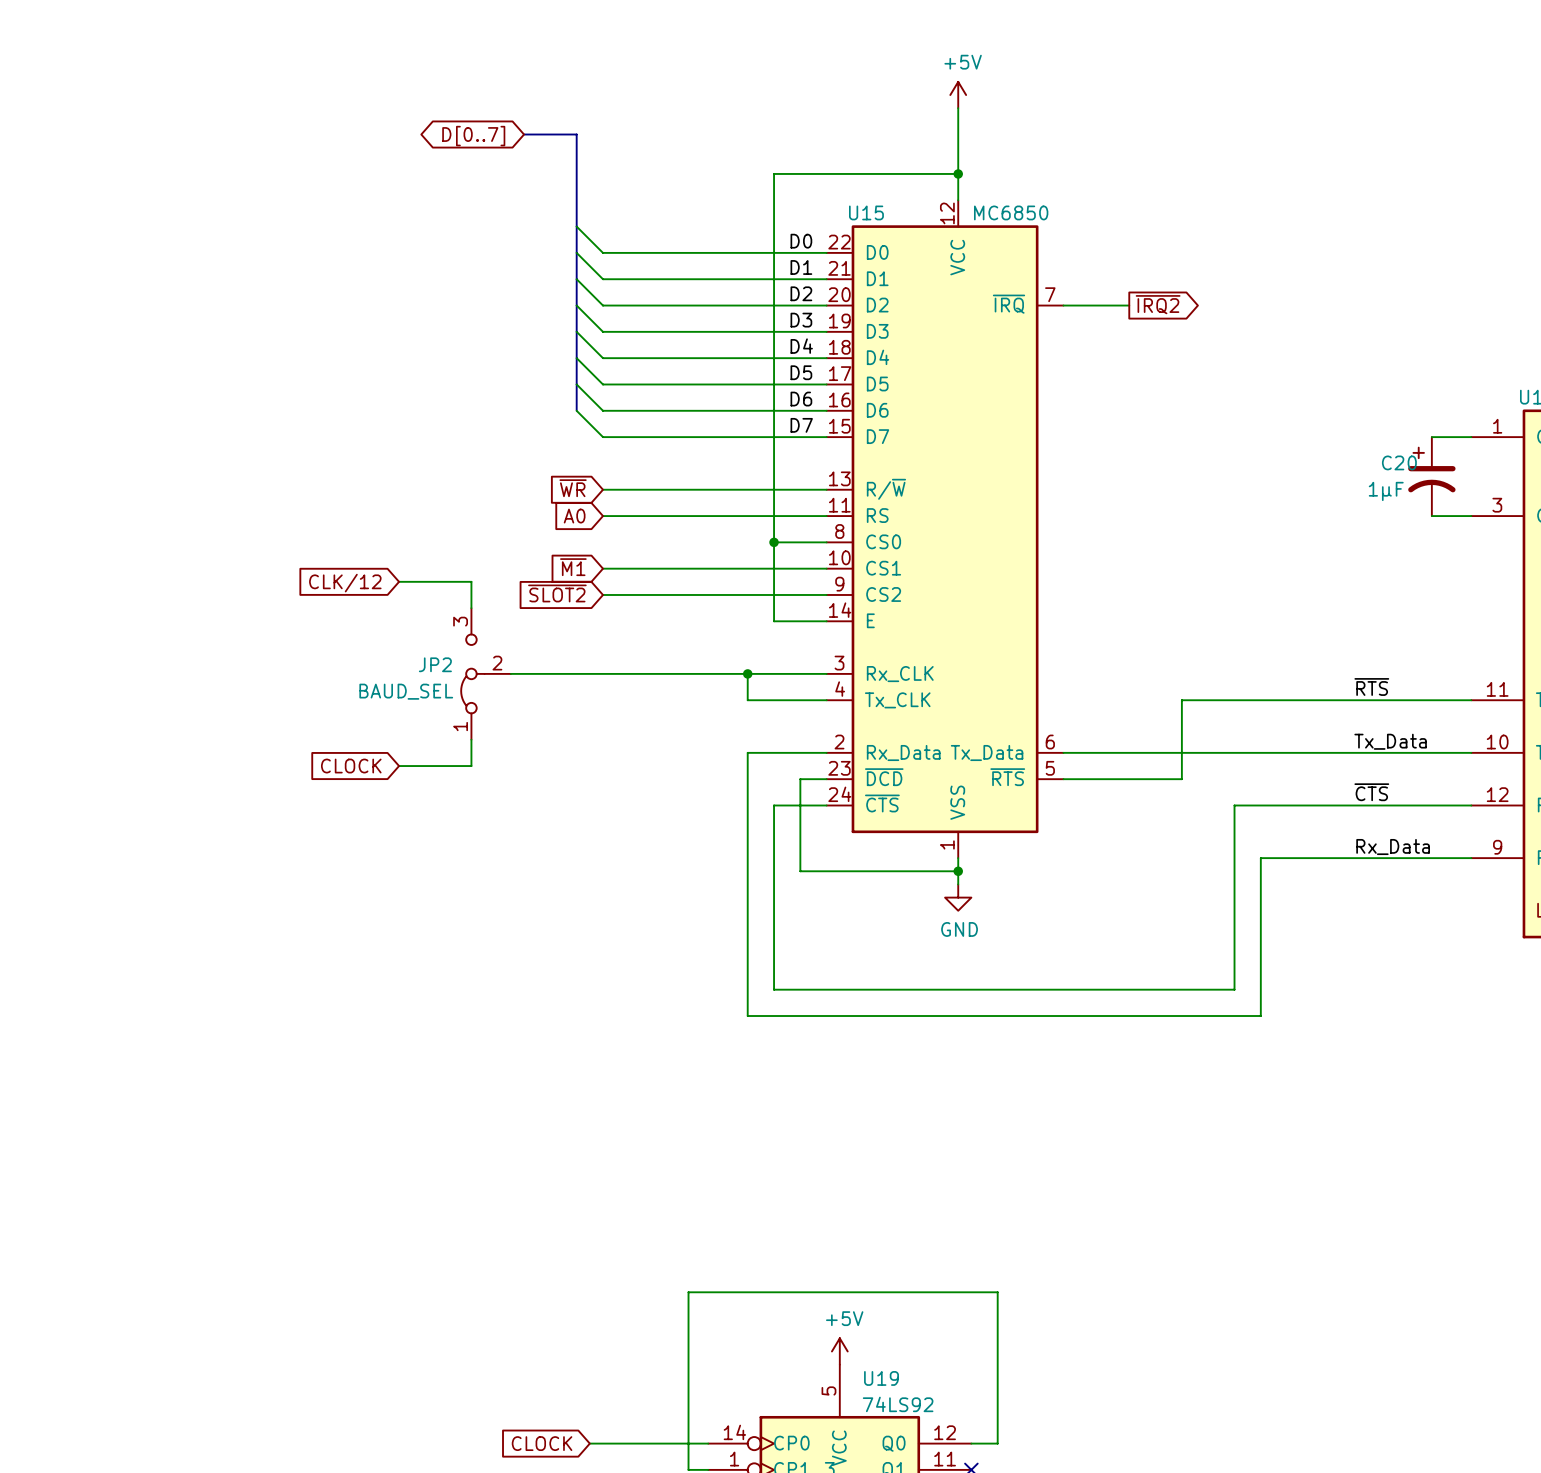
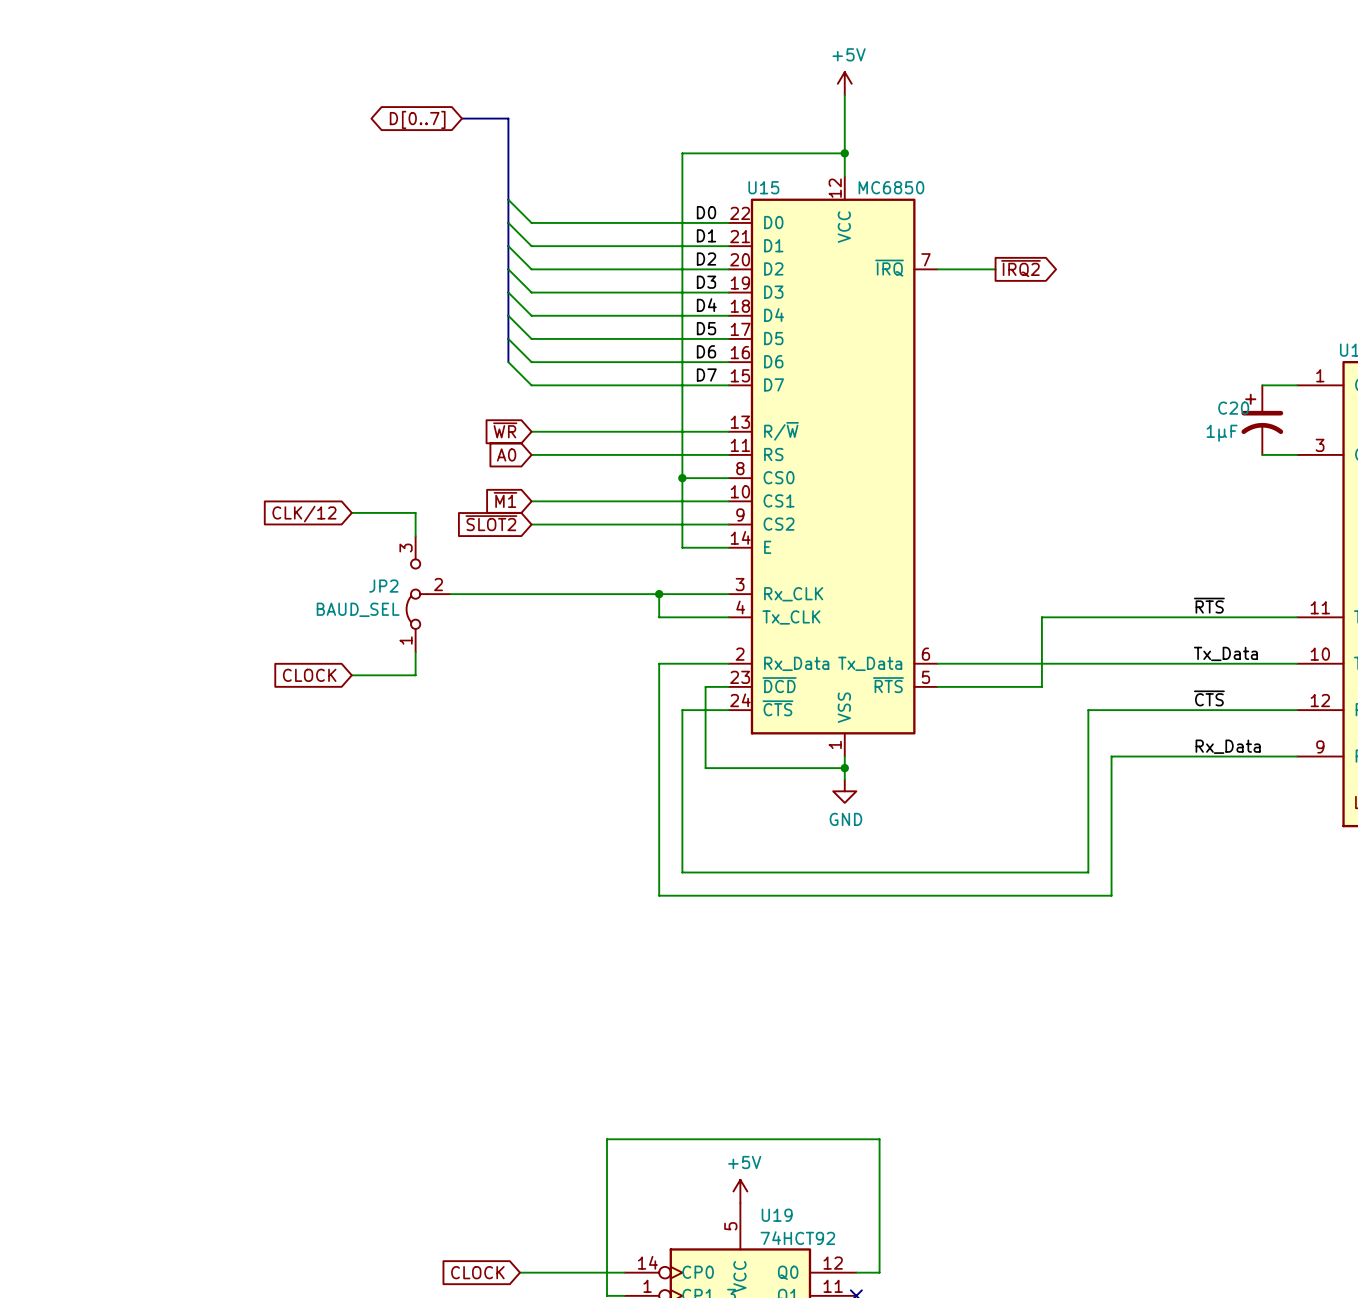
U19 value: 74LS92 (898, 1404) -> 74HCT92 (797, 1238)

